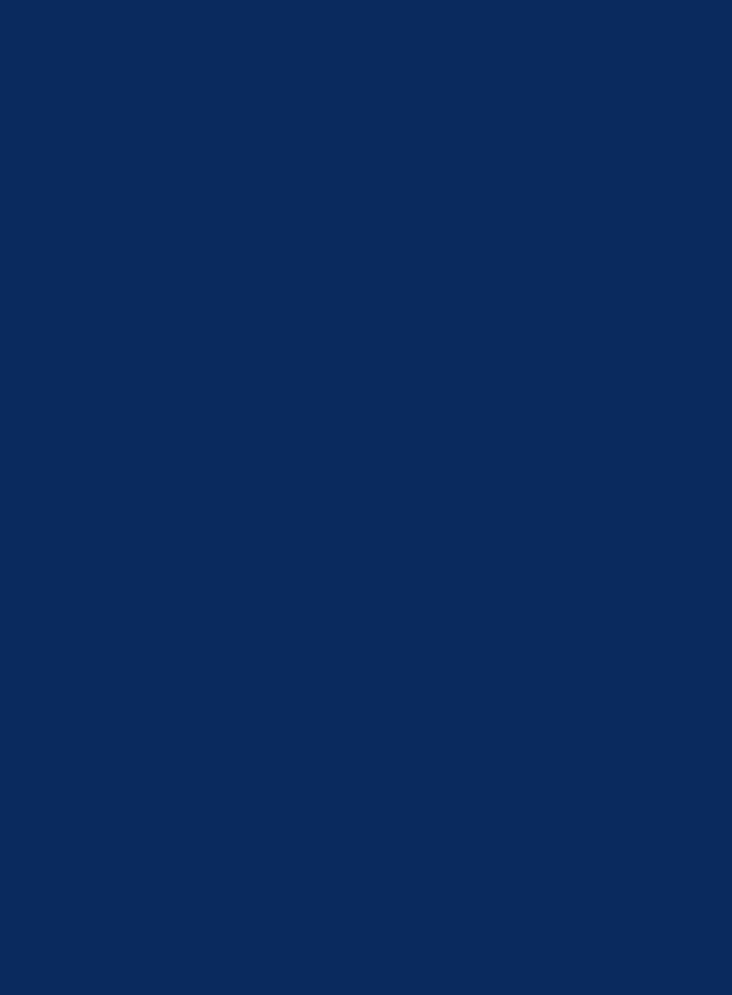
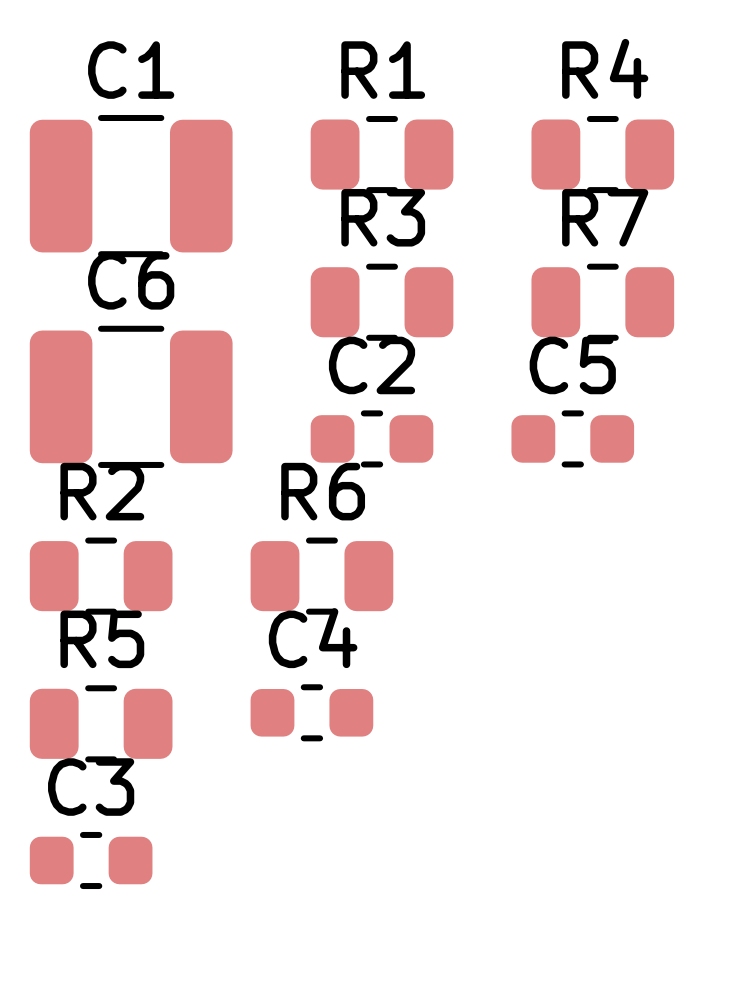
R1: none -> (382, 154)
R4: none -> (602, 154)
C1: none -> (131, 186)
R3: none -> (382, 302)
R7: none -> (602, 302)
C6: none -> (131, 396)
C2: none -> (372, 438)
C5: none -> (572, 438)
R2: none -> (101, 576)
R6: none -> (321, 576)
C4: none -> (311, 712)
R5: none -> (101, 723)
C3: none -> (91, 860)

